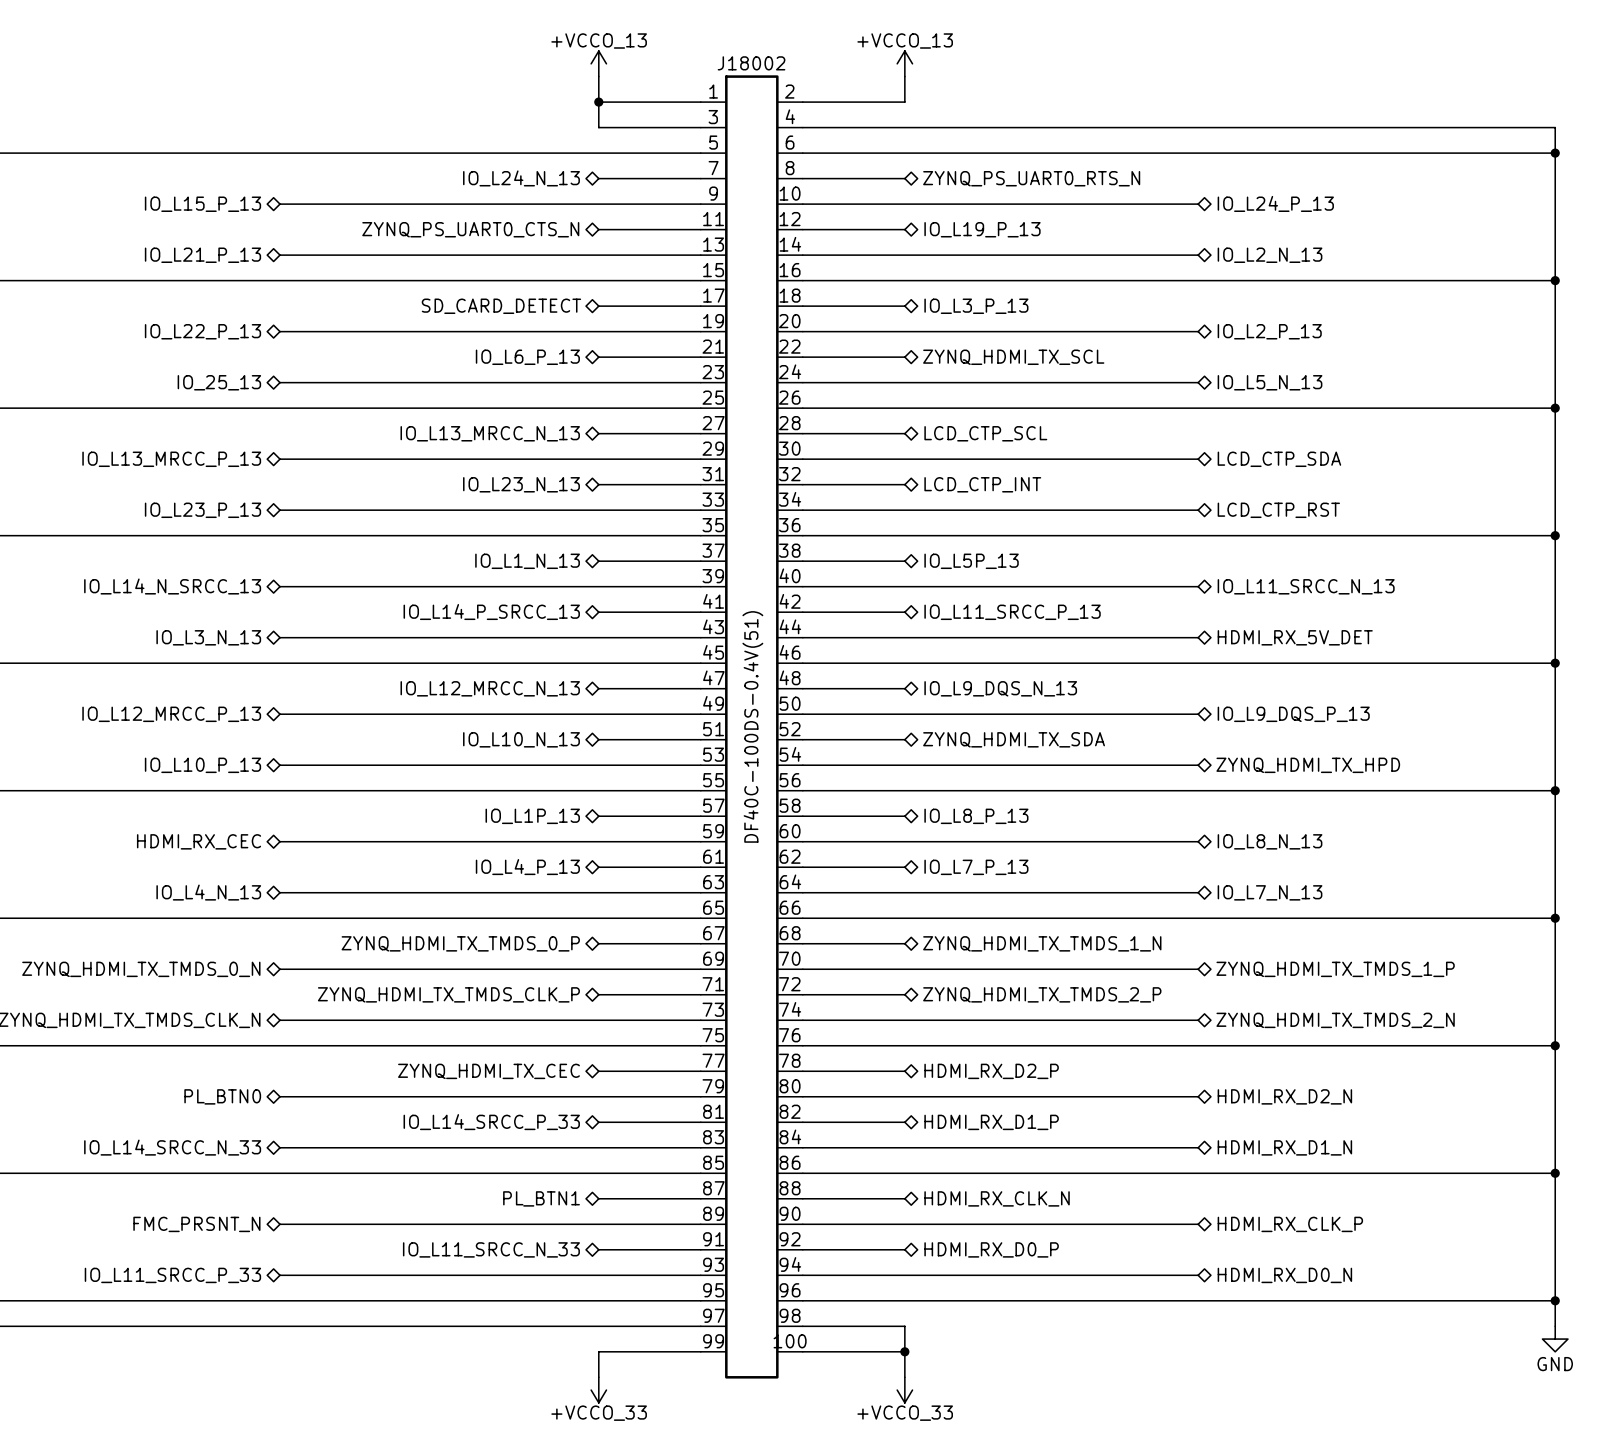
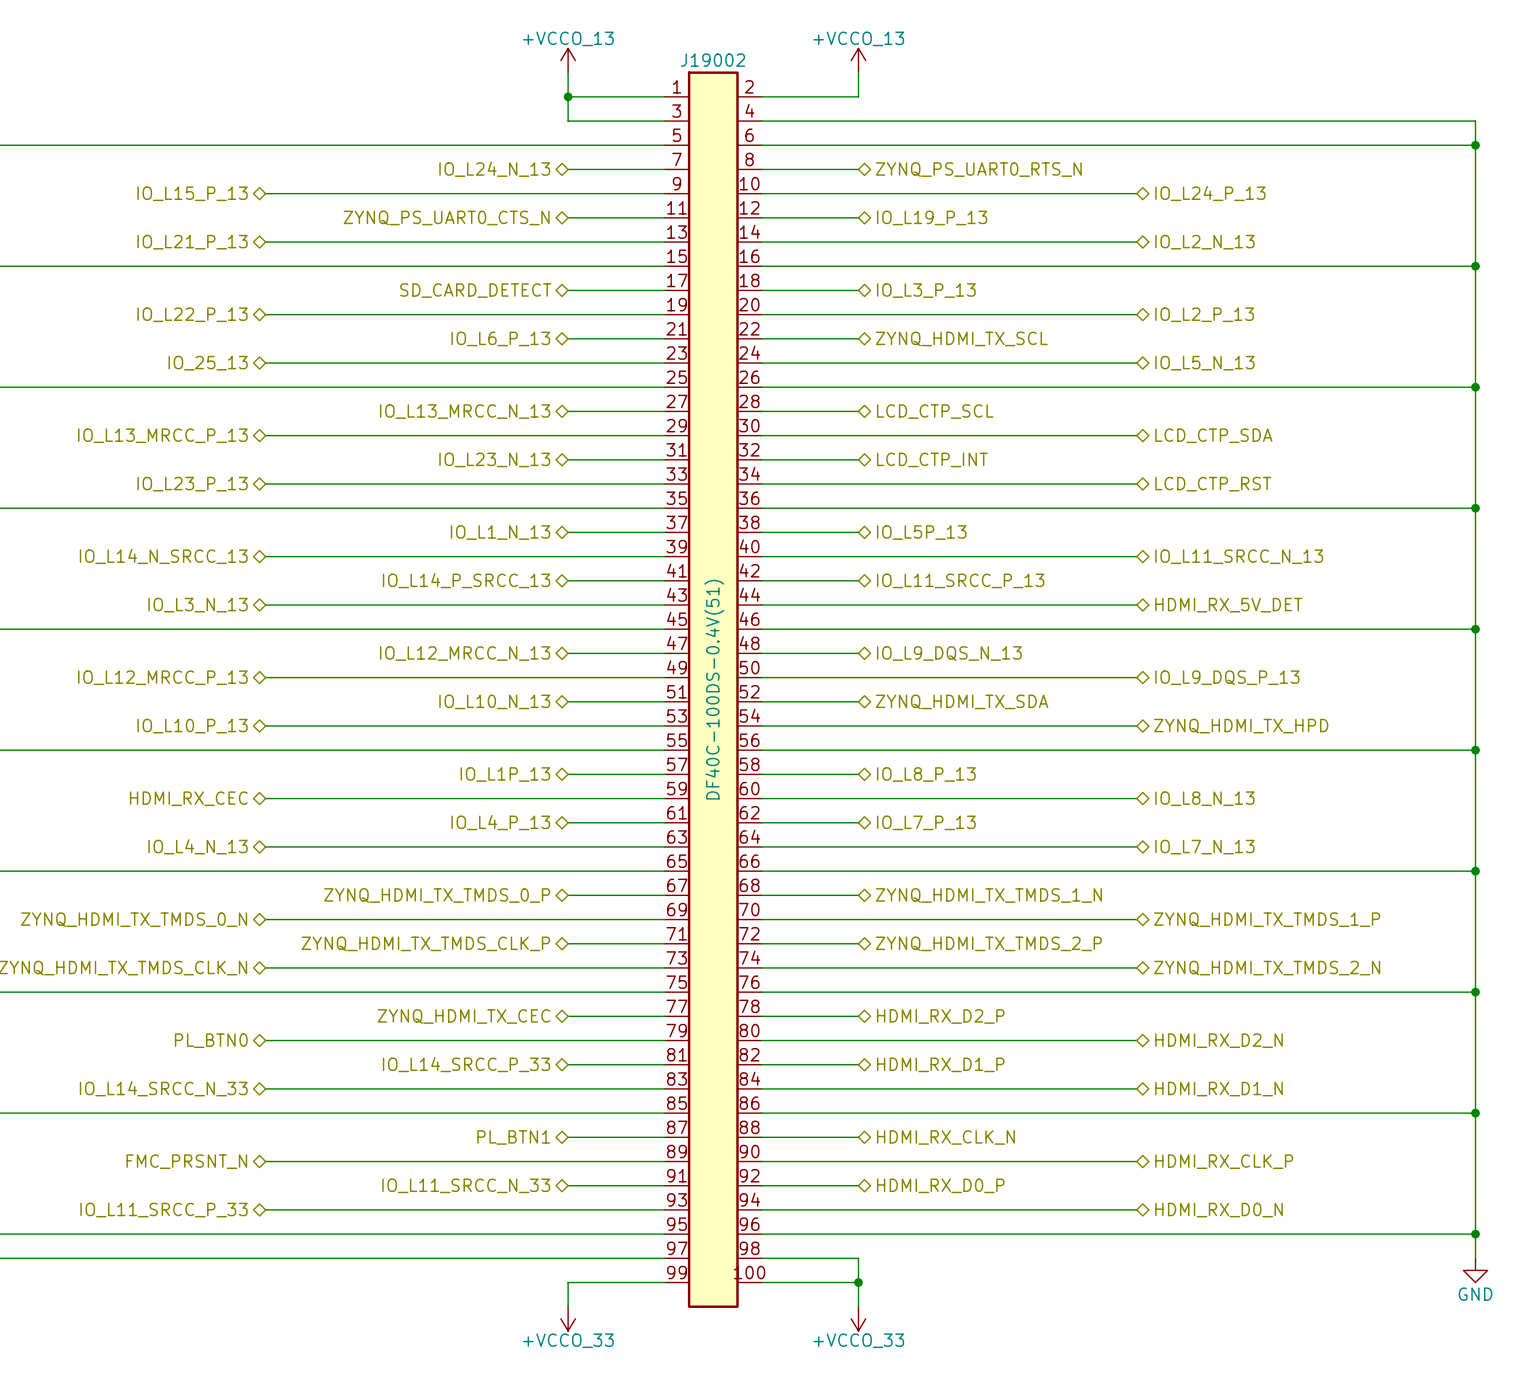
J18002 name: J18002 (751, 63) -> J19002 (713, 60)

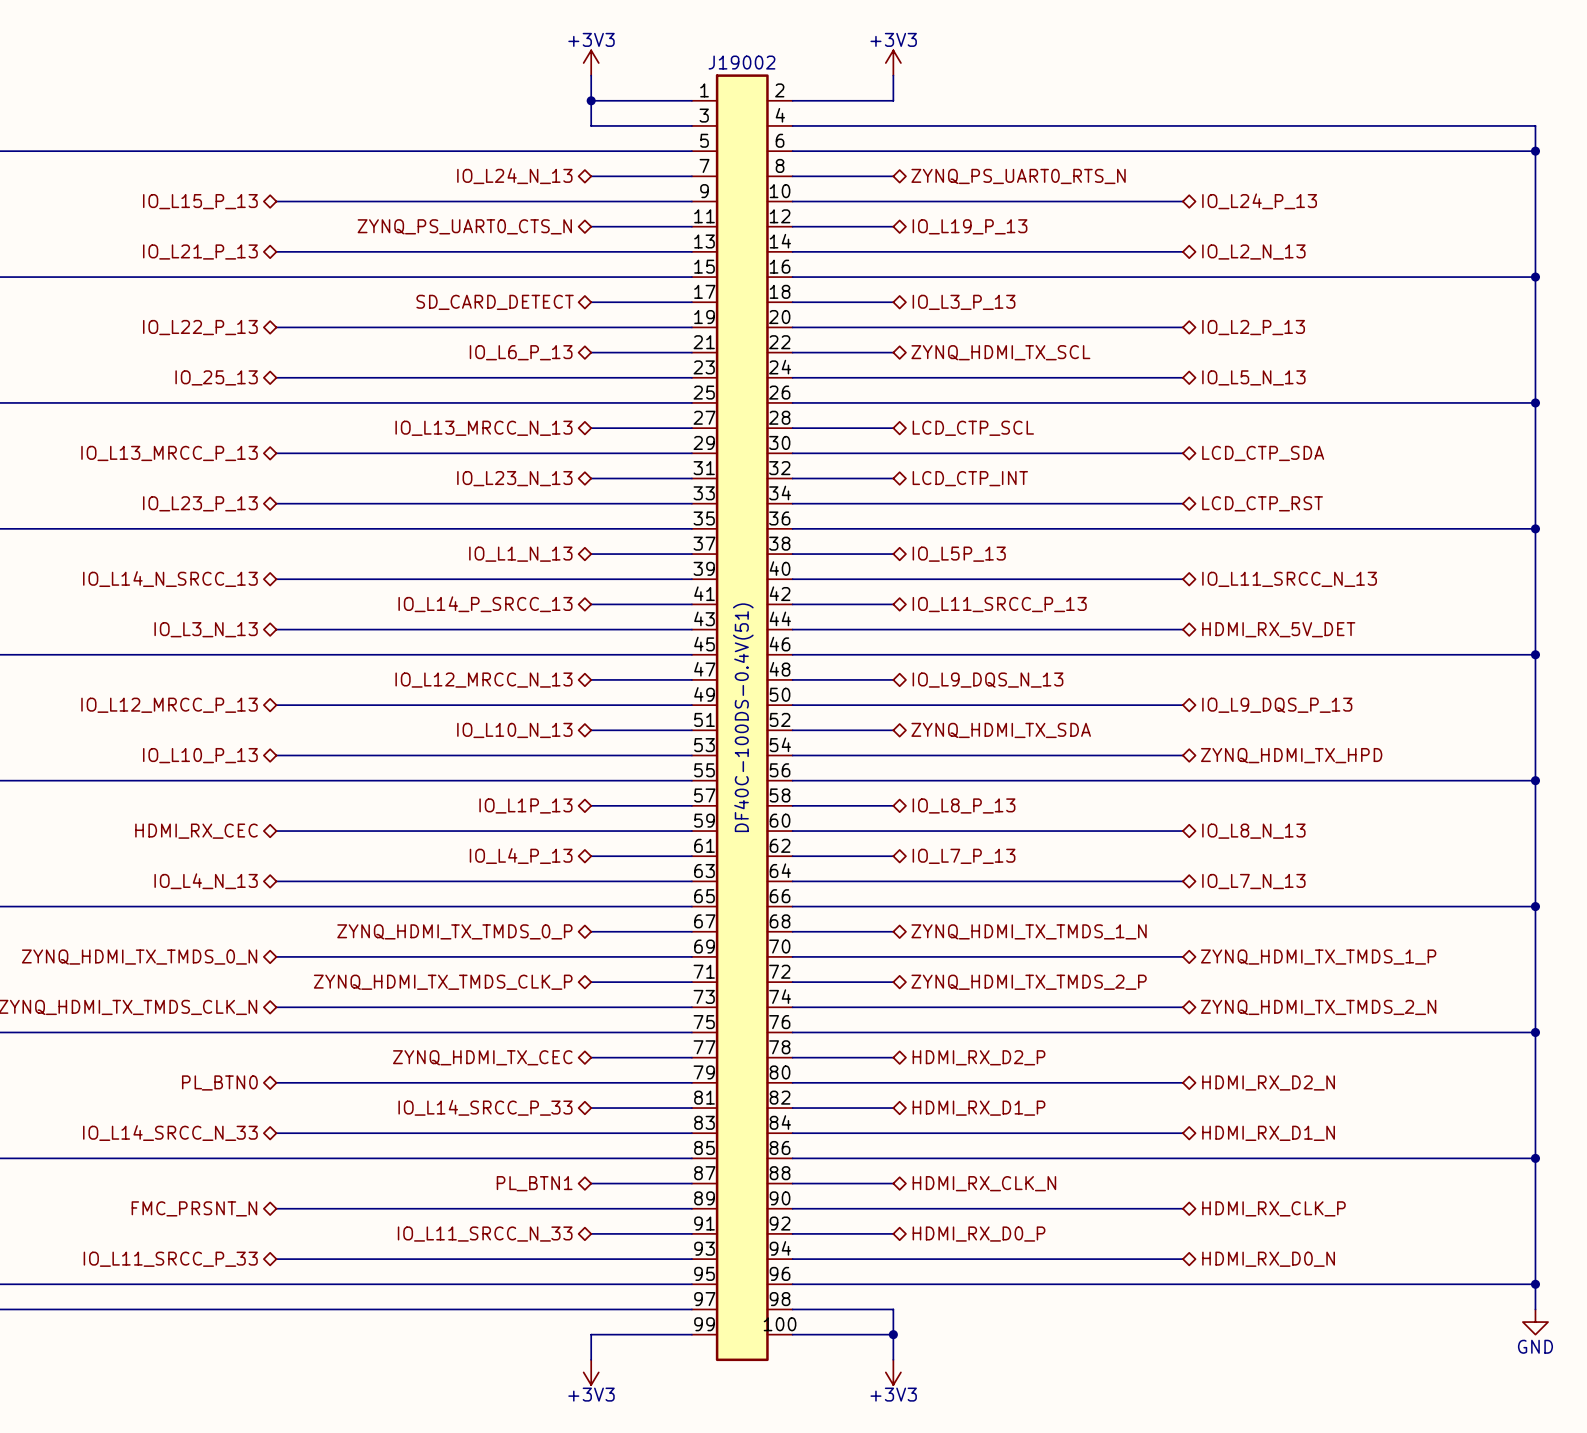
power symbol: +VCCO_13 (568, 60) -> +3V3 (591, 63)
power symbol: +VCCO_13 (858, 60) -> +3V3 (893, 63)
power symbol: +VCCO_33 (568, 1318) -> +3V3 (591, 1372)
power symbol: +VCCO_33 (858, 1318) -> +3V3 (893, 1372)

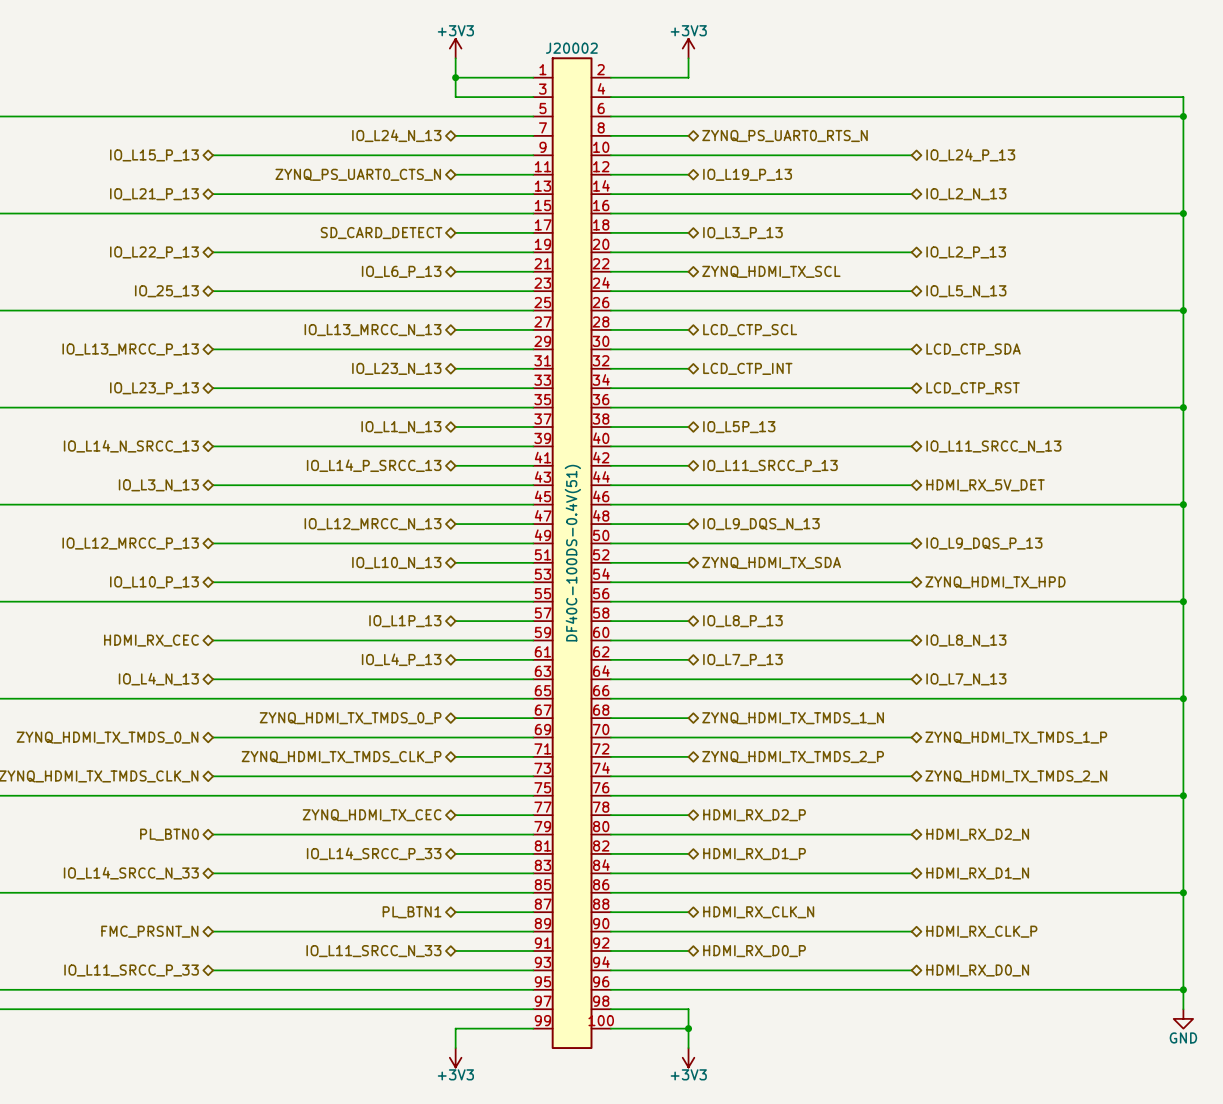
J19002 name: J19002 (741, 62) -> J20002 (571, 48)

